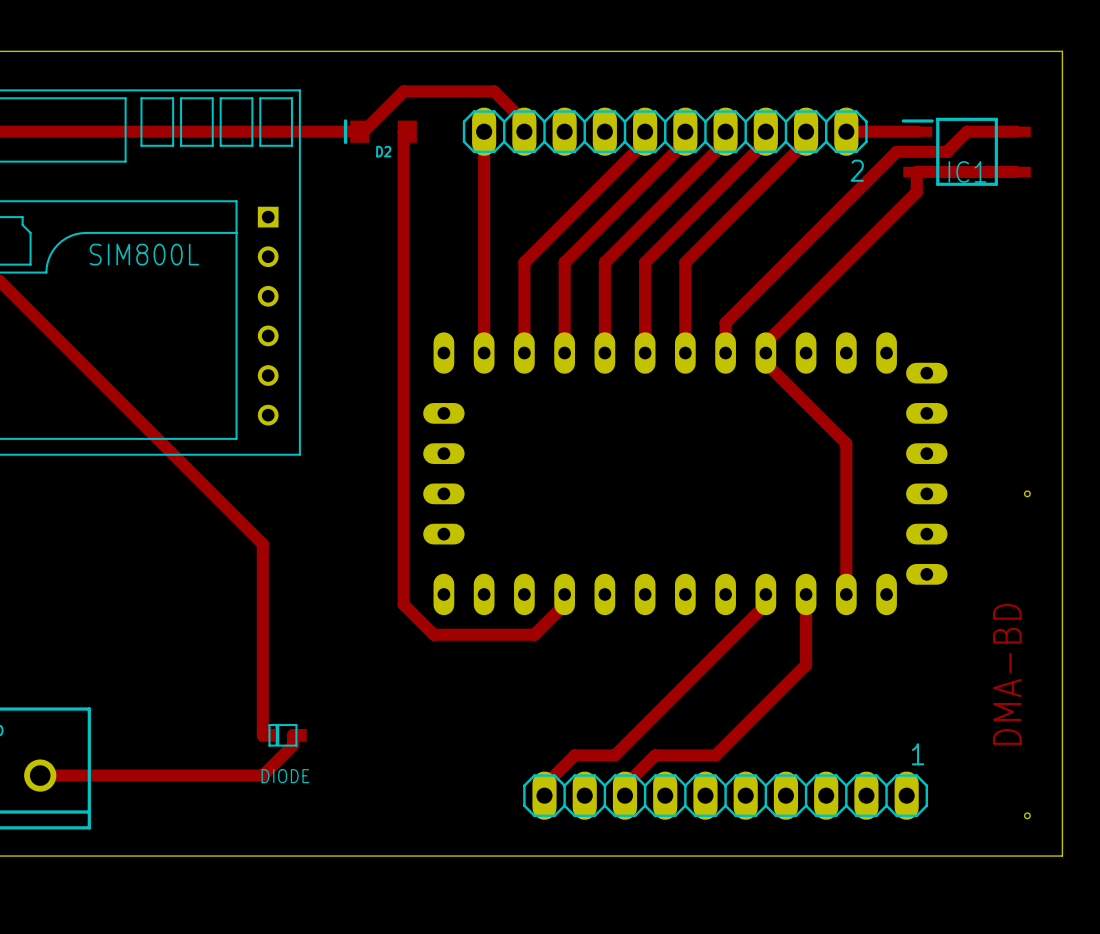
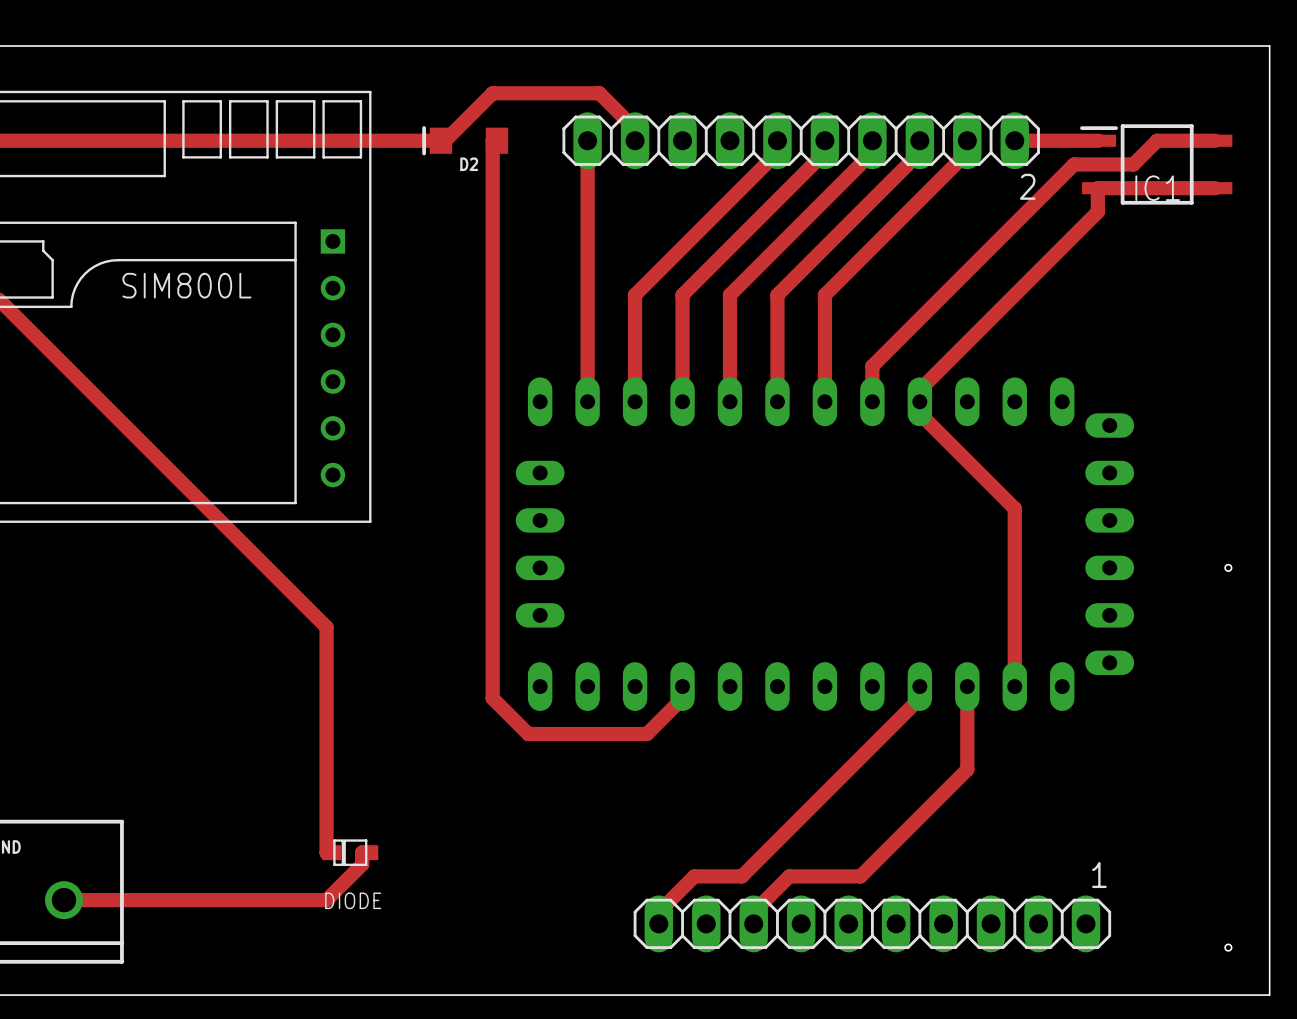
text: DMA-BD (1007, 674) -> none

